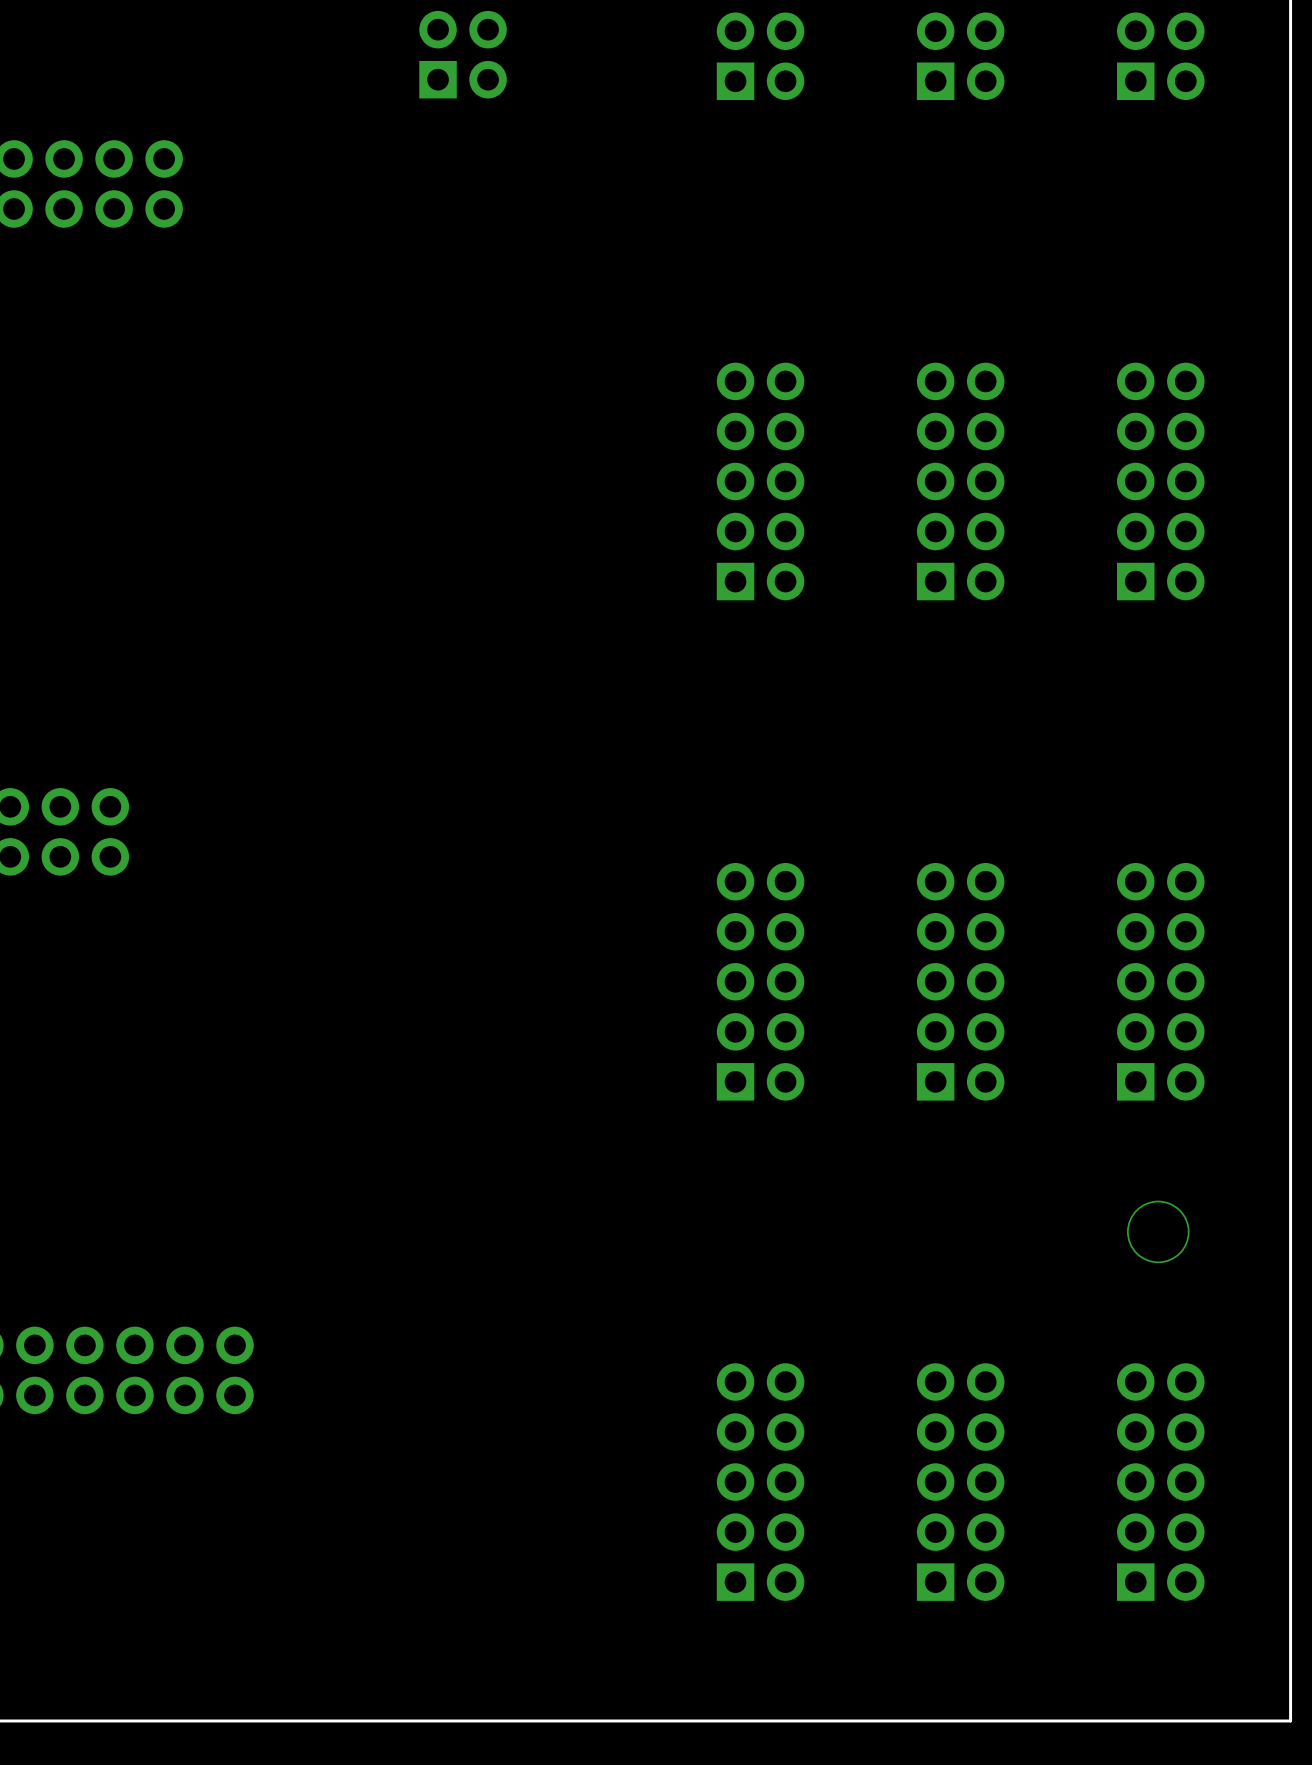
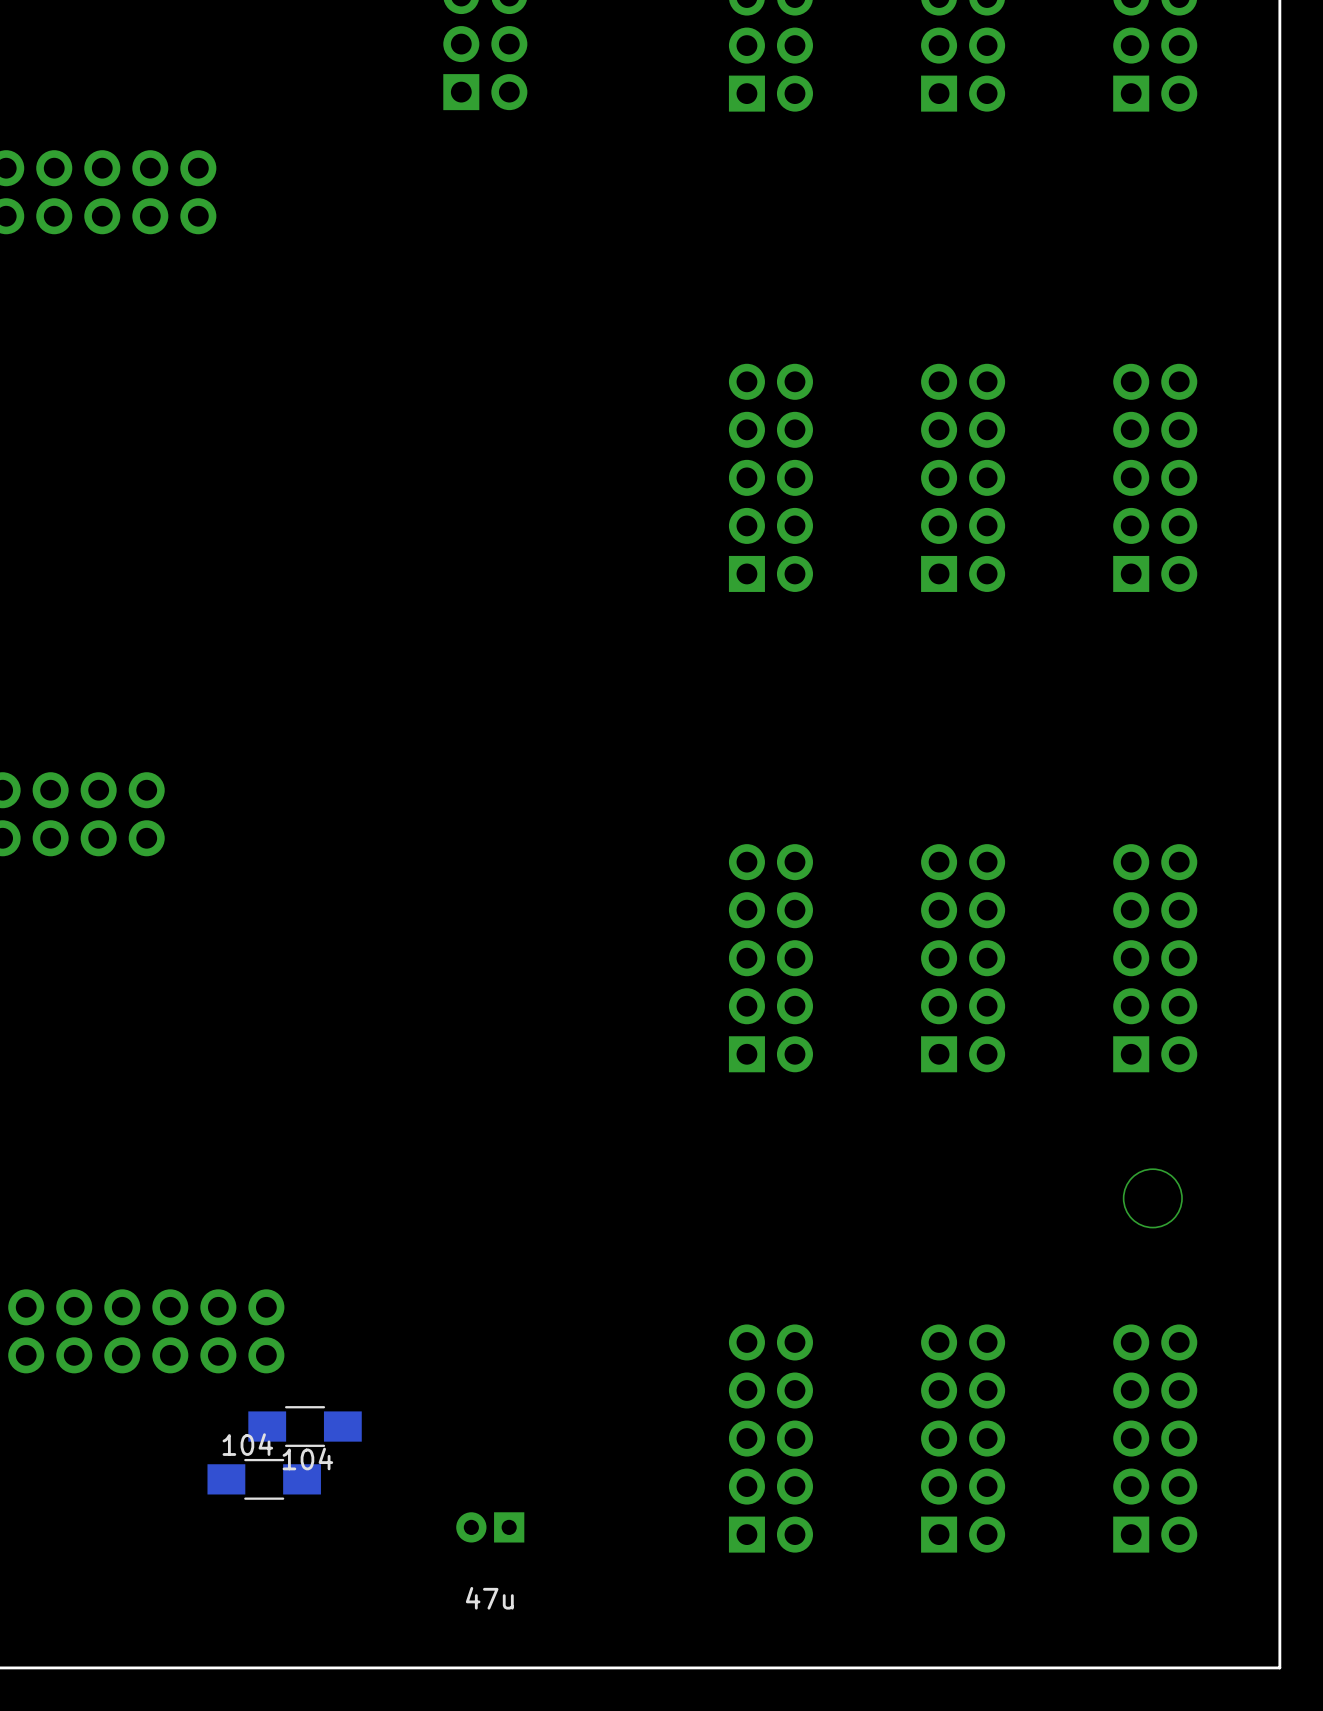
part: none -> 104 (305, 1426)
part: none -> 104 (264, 1479)
part: none -> 47u (490, 1527)

